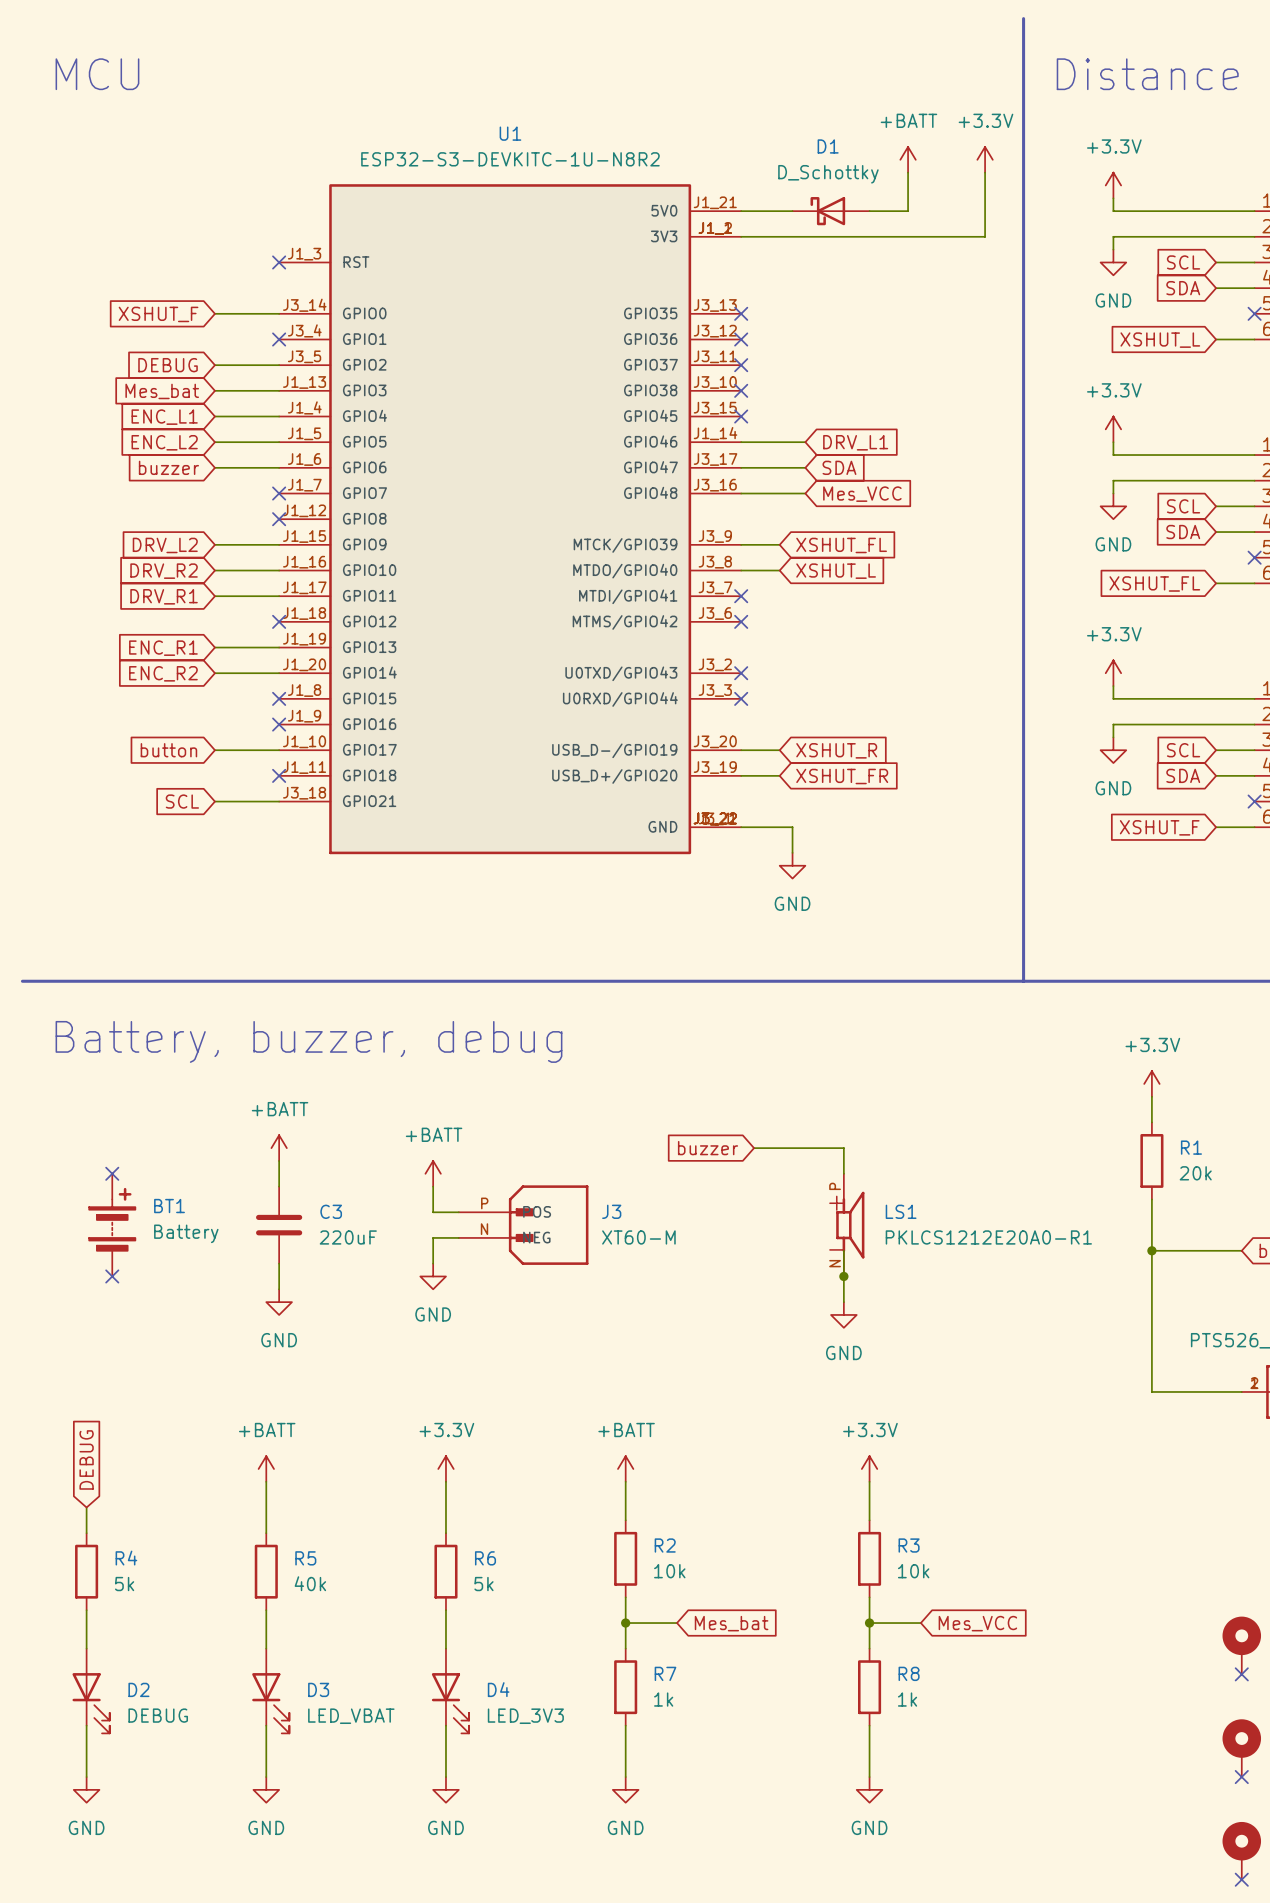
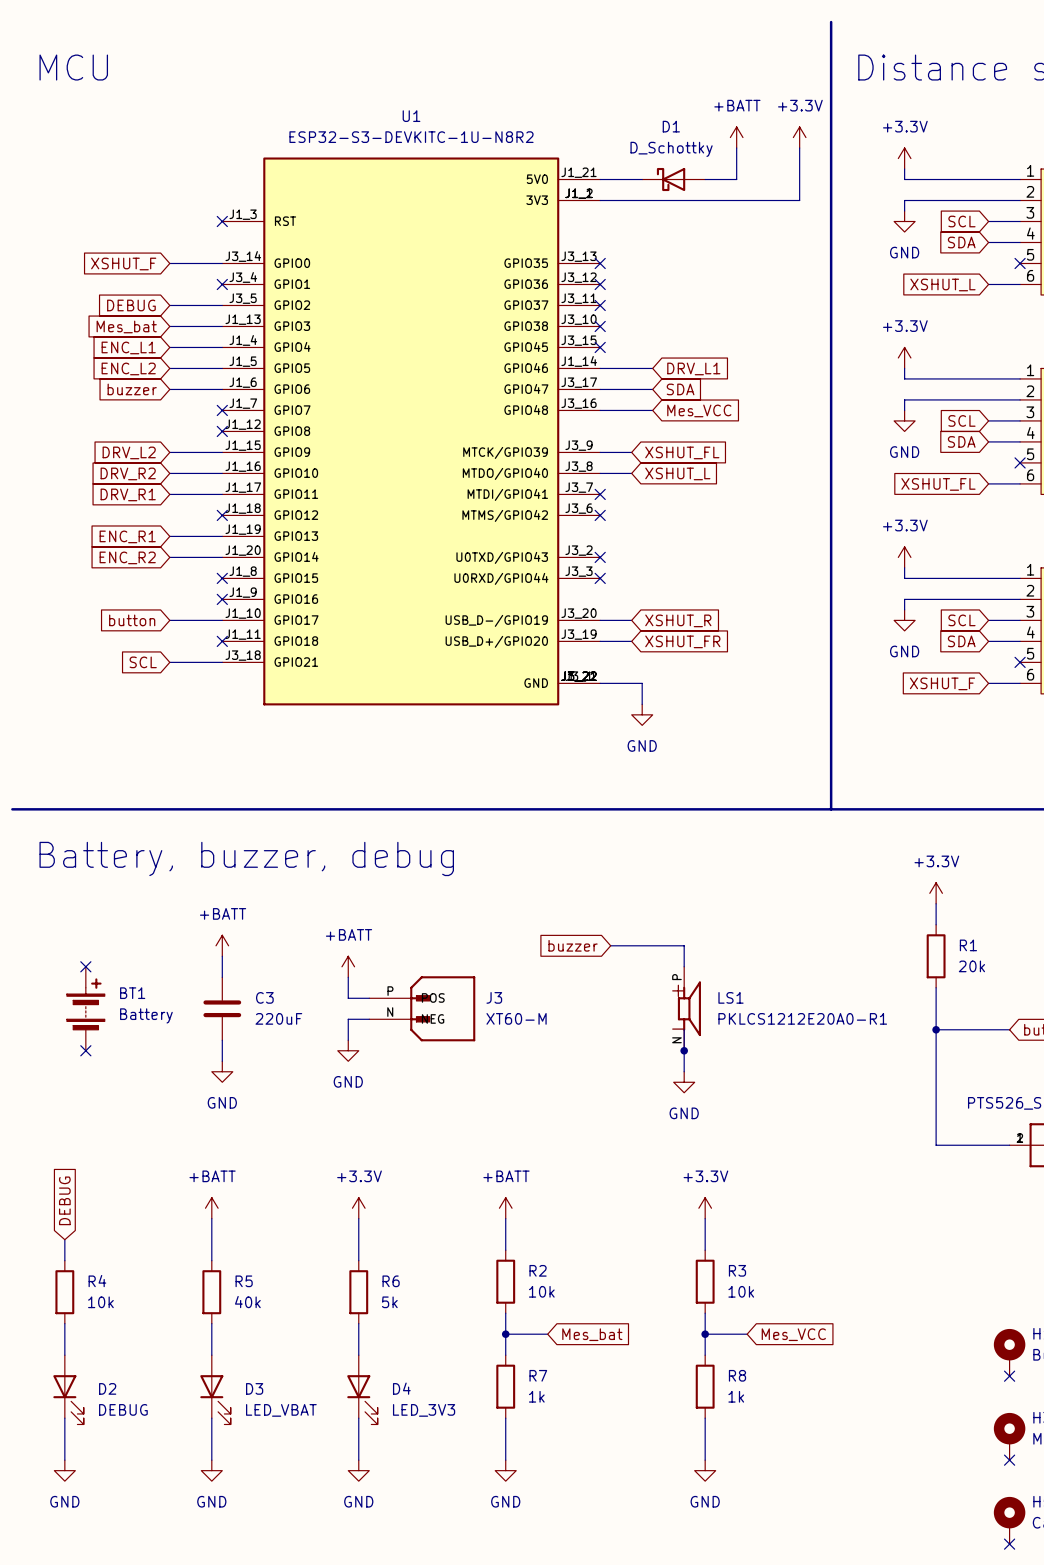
R4 value: 5k (124, 1584) -> 10k (100, 1302)

